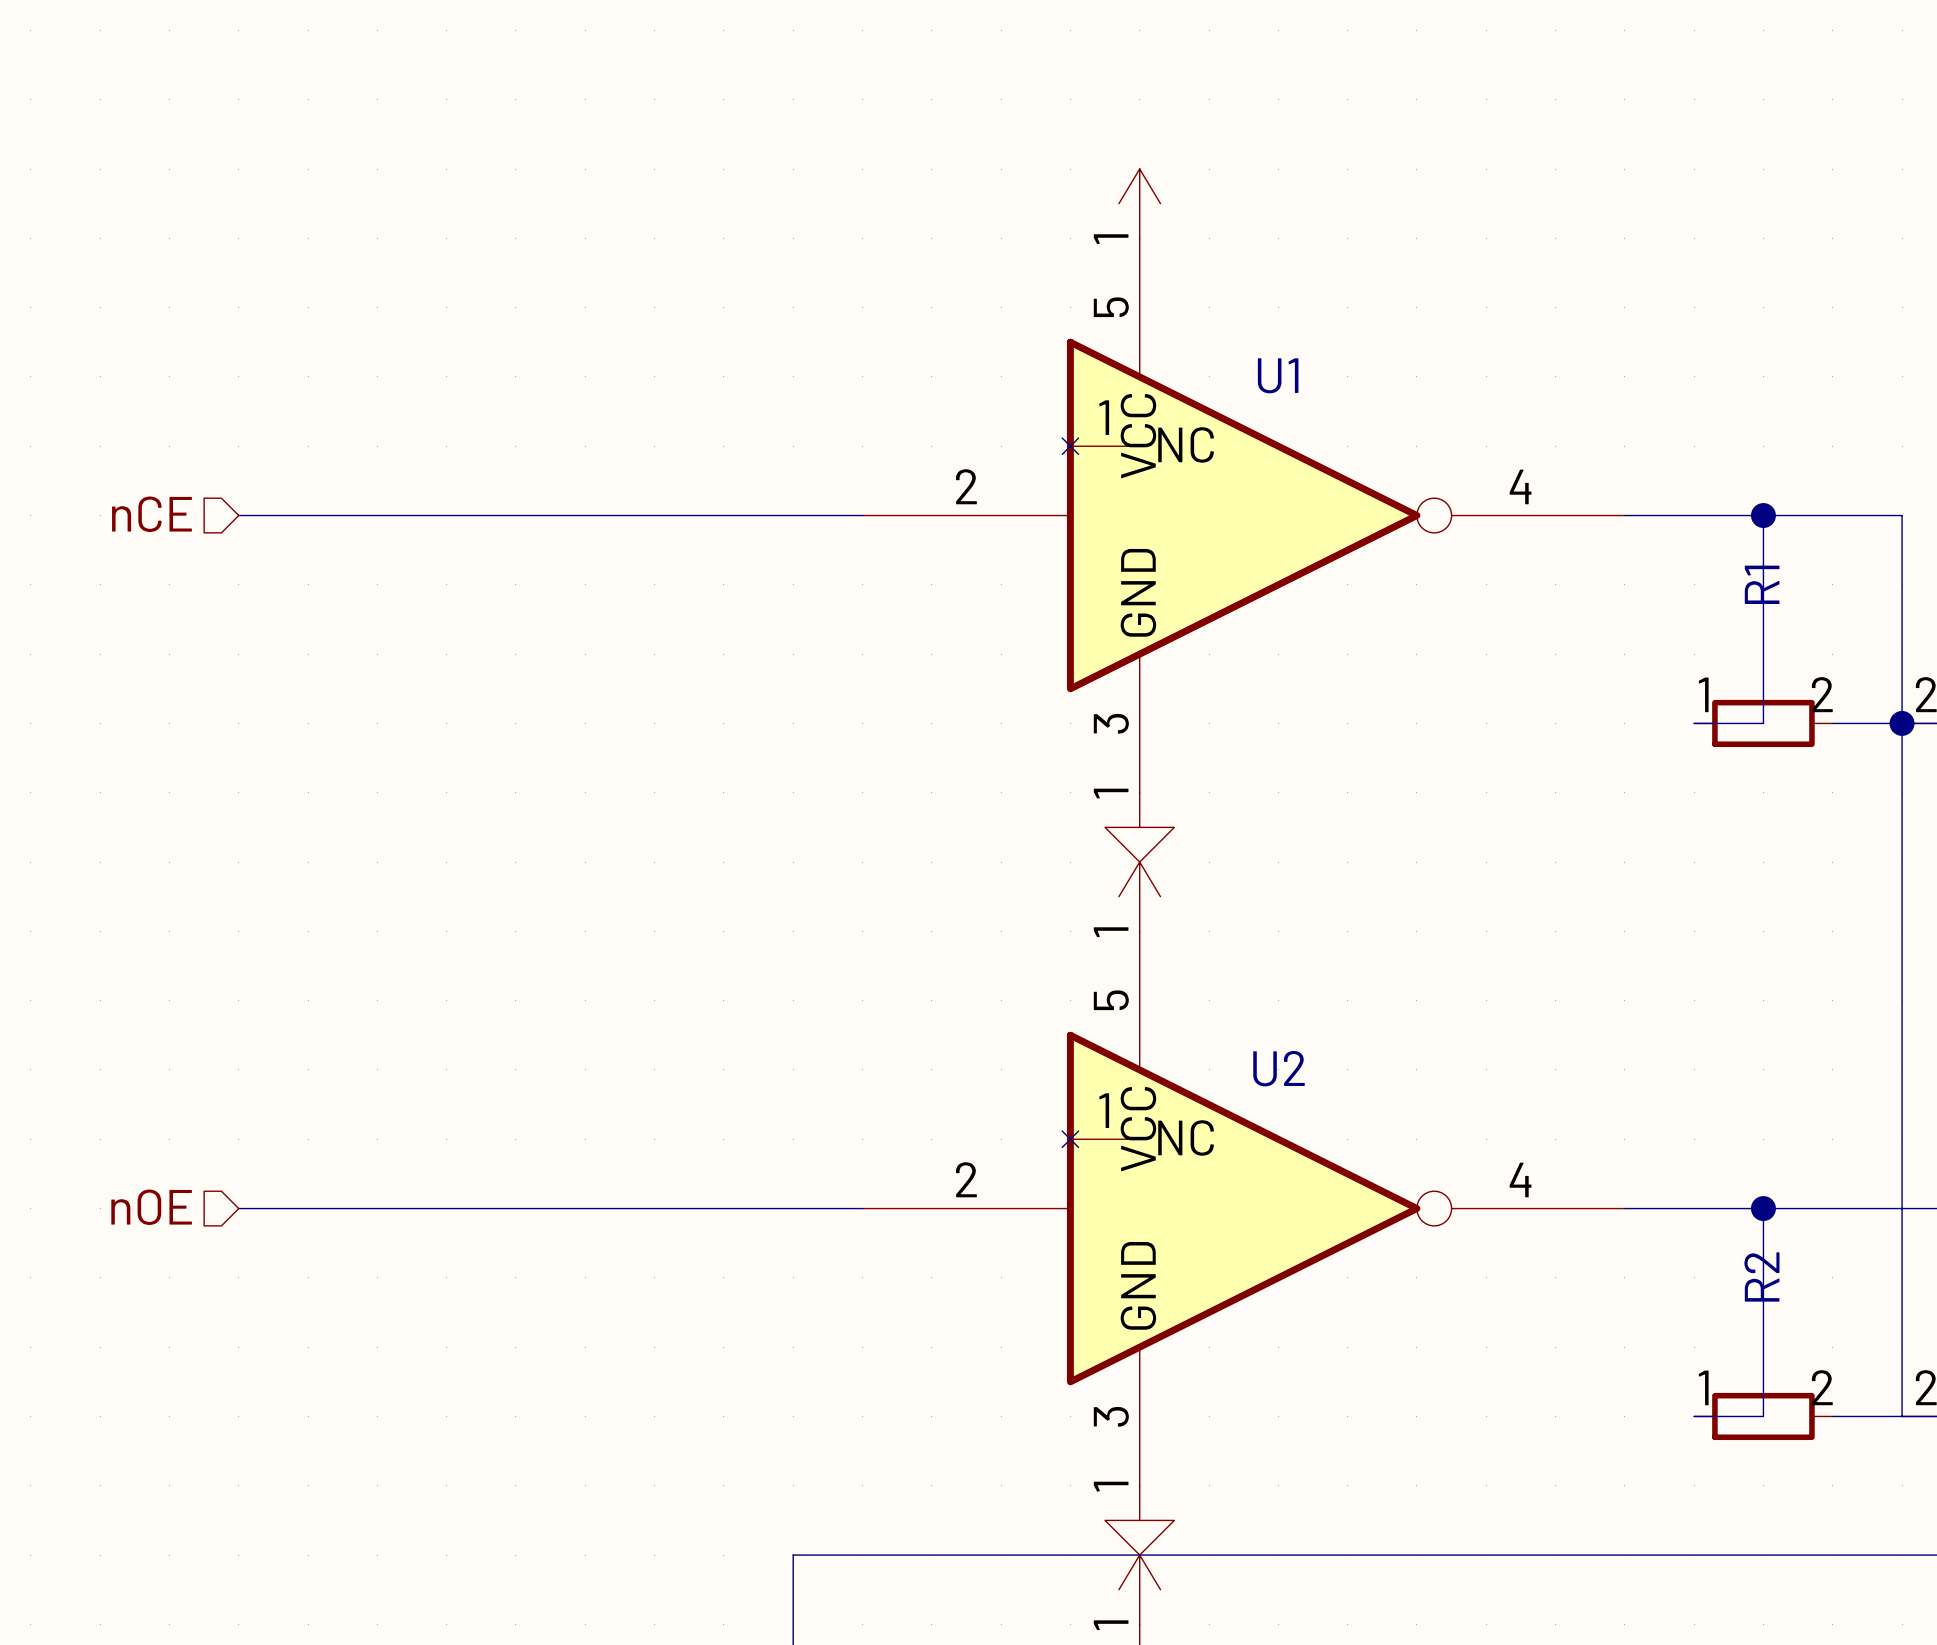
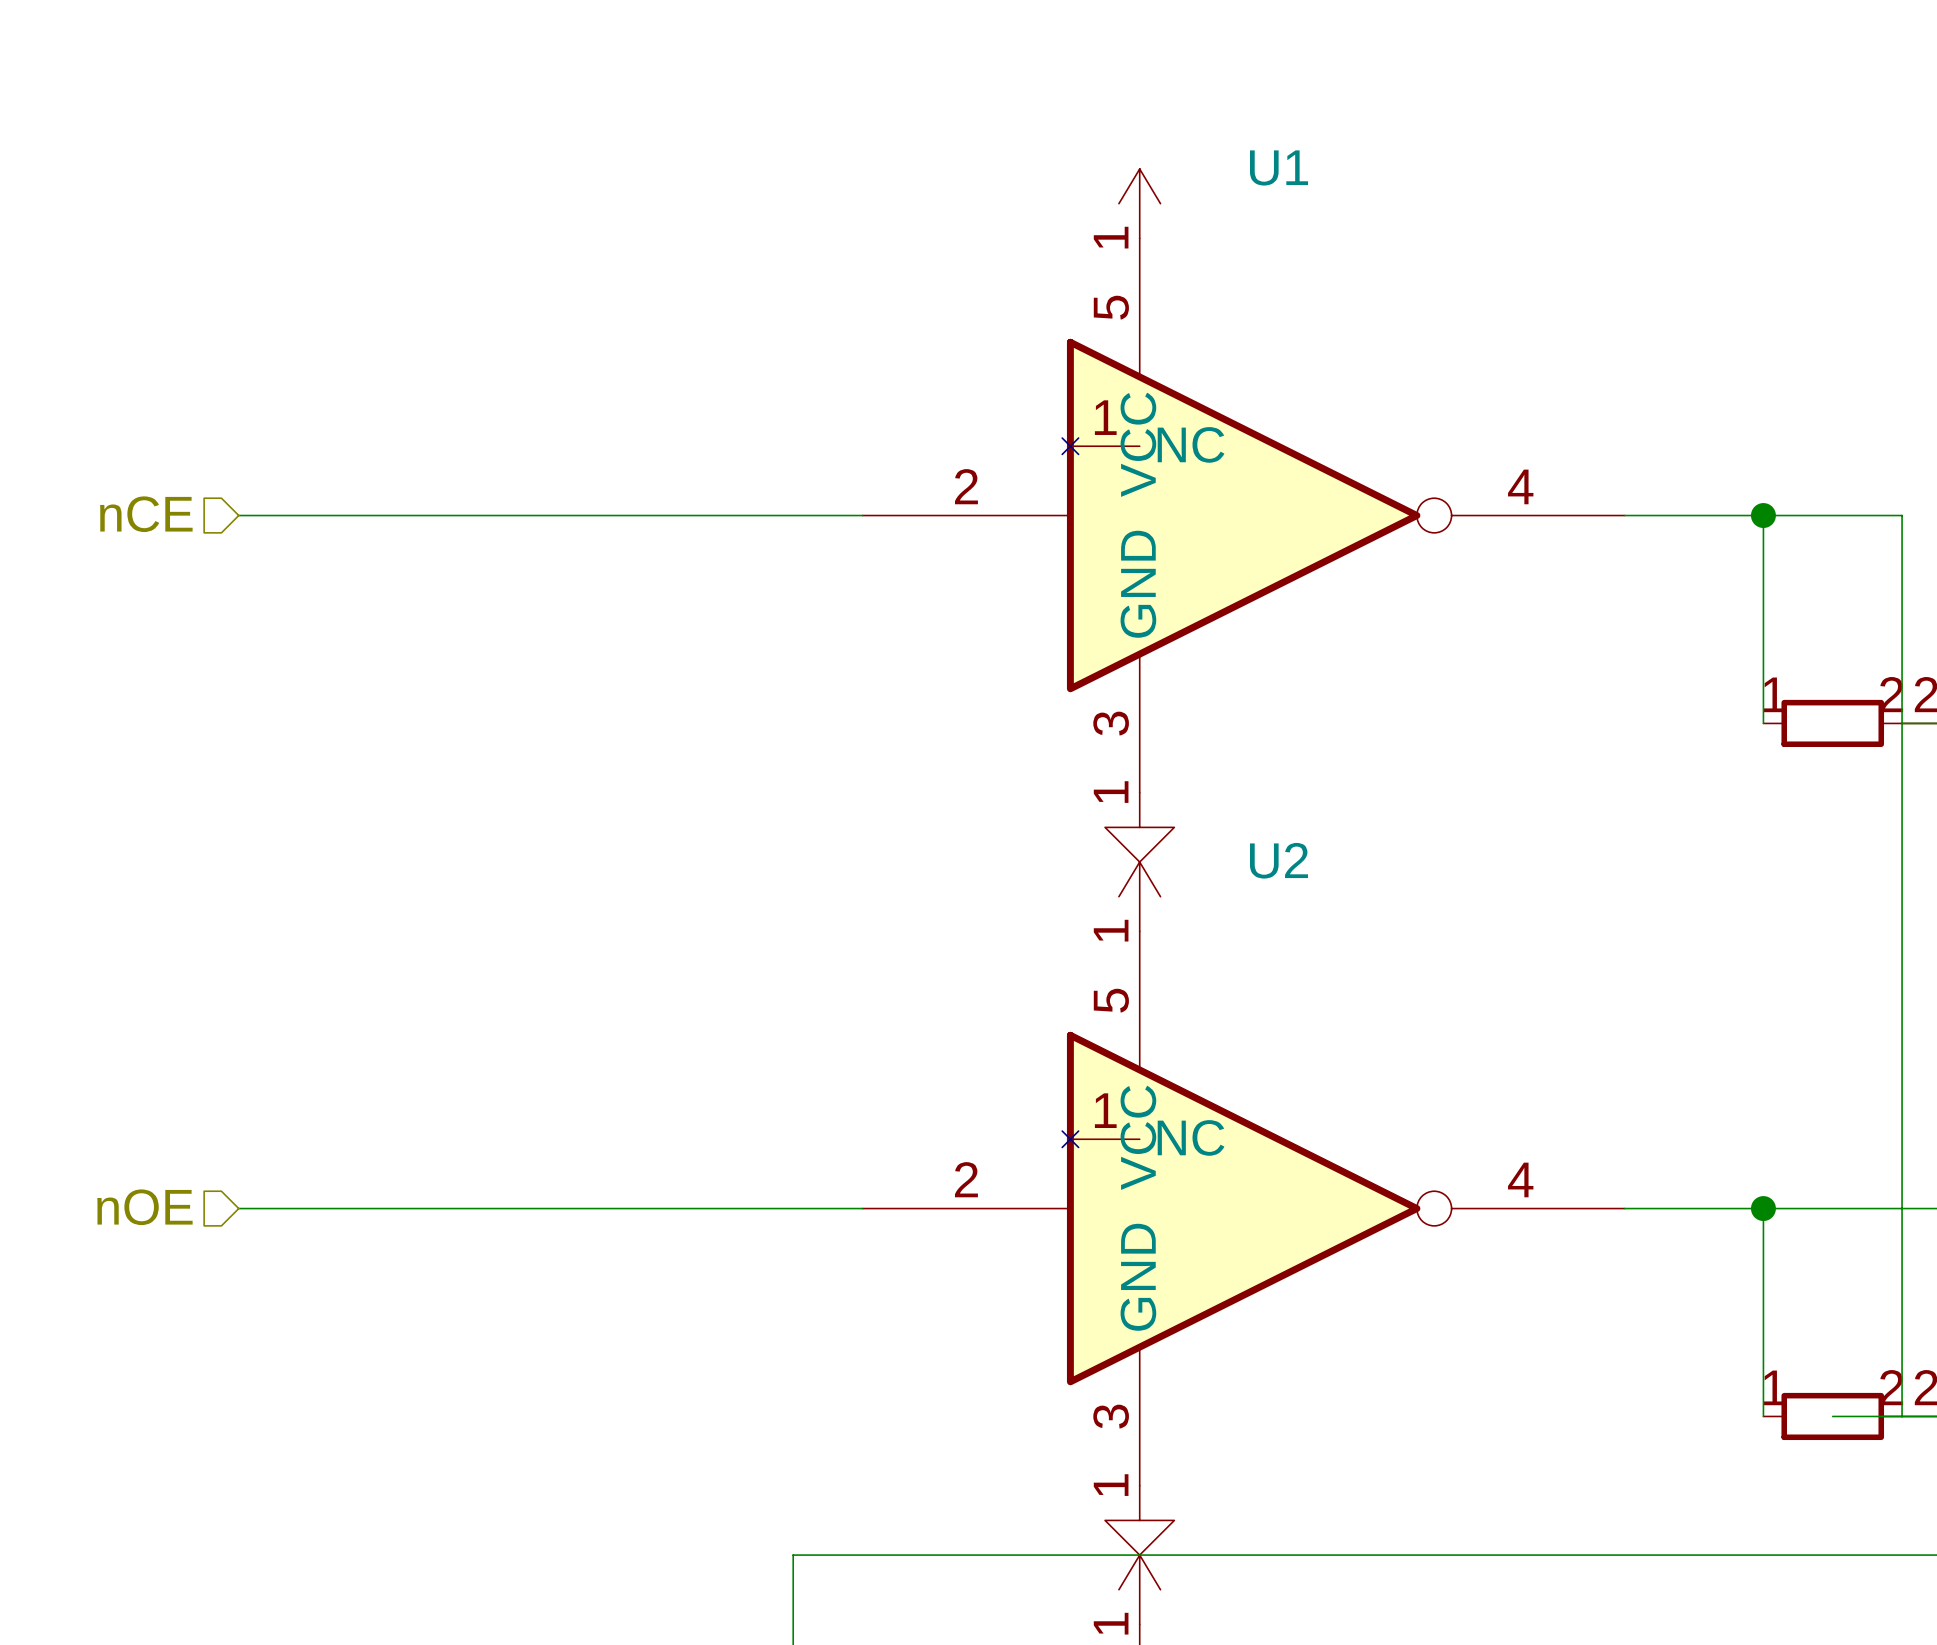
U1 name position: U1 (1278, 375) -> U1 (1279, 167)
wire: (1694, 723) (1763, 723) -> none
R1: (1763, 723) -> none
wire: (1832, 723) (1902, 723) -> none
part: none -> (1832, 723)
junction: (1902, 723) -> none
U2 name position: U2 (1279, 1068) -> U2 (1278, 860)
wire: (1694, 1416) (1763, 1416) -> none
R2: (1763, 1416) -> none
part: none -> (1832, 1416)

